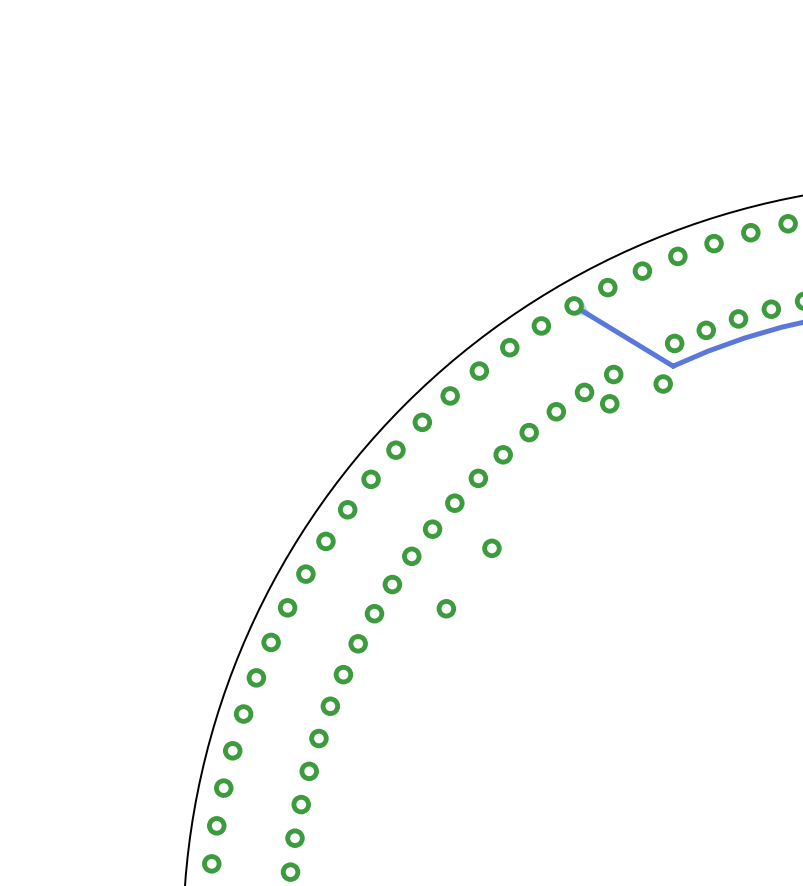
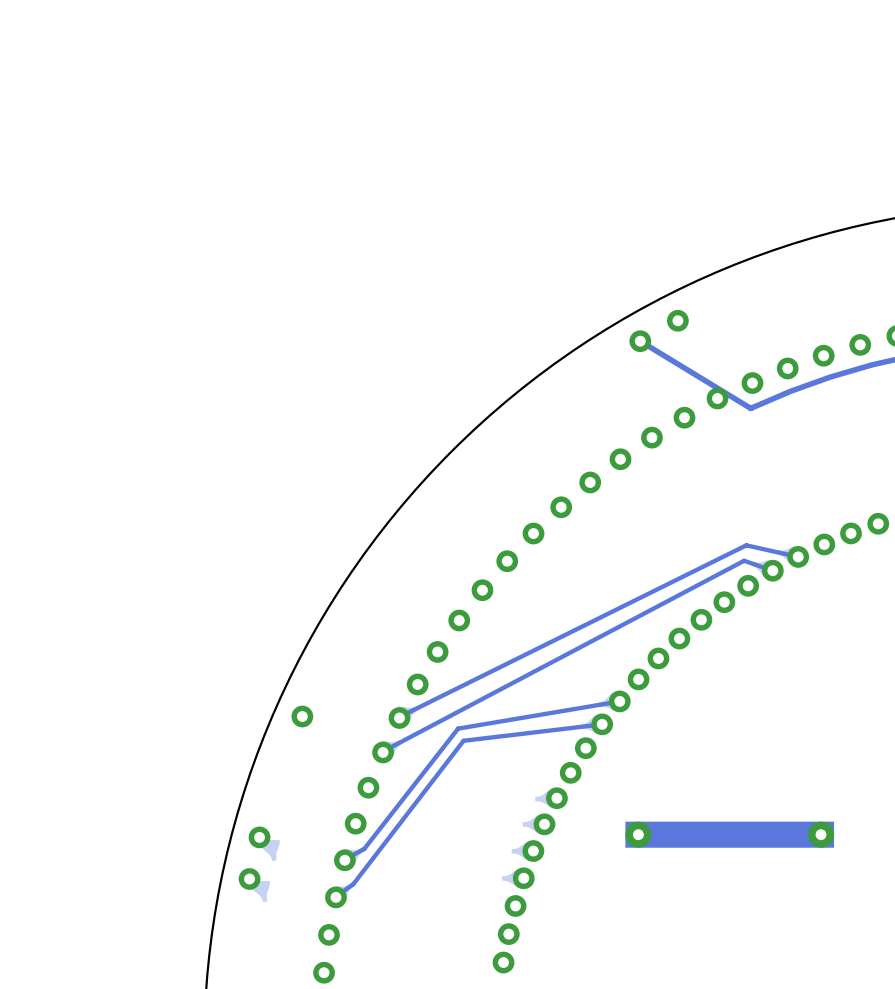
via: (788, 223) -> none
via: (750, 232) -> none
via: (714, 243) -> none
via: (677, 256) -> none
via: (642, 271) -> none
via: (541, 325) -> none
via: (509, 347) -> none
via: none -> (717, 398)
via: (479, 371) -> none
via: (663, 383) -> none
via: (450, 395) -> none
via: (609, 403) -> none
via: (422, 422) -> none
via: (395, 450) -> none
via: none -> (878, 523)
via: none -> (851, 533)
via: (371, 479) -> none
via: none -> (824, 544)
track: none -> (798, 556) (746, 545) (398, 717)
via: none -> (798, 556)
via: (347, 509) -> none
track: none -> (772, 570) (744, 560) (382, 752)
via: none -> (772, 570)
via: none -> (748, 585)
via: none -> (724, 602)
via: (325, 541) -> none
via: (491, 548) -> none
via: none -> (701, 619)
via: none -> (679, 638)
via: (305, 574) -> none
via: none -> (658, 658)
via: (287, 607) -> none
via: (446, 608) -> none
via: none -> (638, 679)
track: none -> (619, 701) (458, 728) (364, 849) (343, 859)
via: none -> (619, 701)
track: none -> (602, 724) (463, 740) (353, 884) (334, 897)
via: none -> (602, 724)
via: none -> (585, 748)
via: (256, 677) -> none
via: none -> (570, 772)
via: (243, 714) -> none
via: none -> (556, 798)
via: none -> (544, 824)
part: none -> (729, 834)
via: none -> (533, 851)
via: none -> (523, 878)
via: none -> (515, 905)
via: (216, 825) -> none
via: none -> (508, 934)
via: (211, 863) -> none
via: none -> (503, 962)

